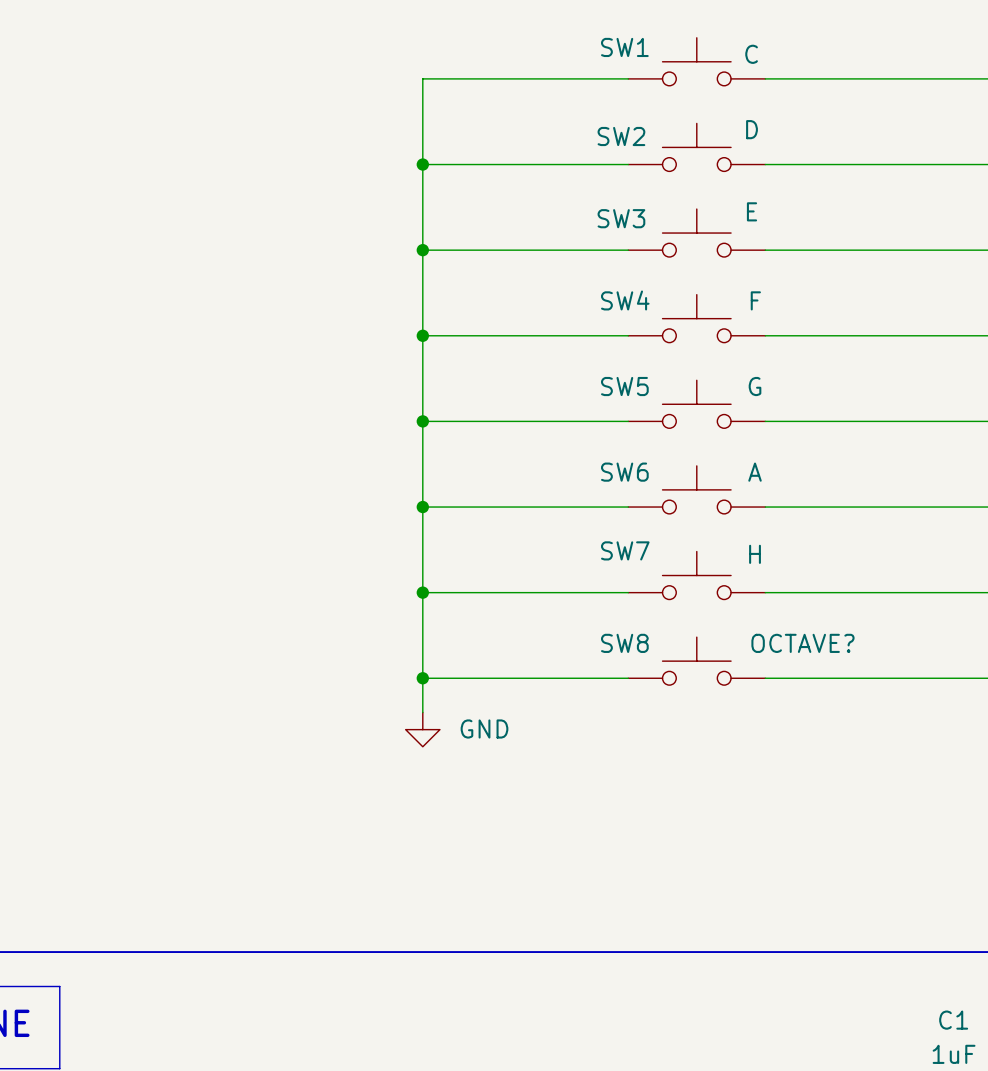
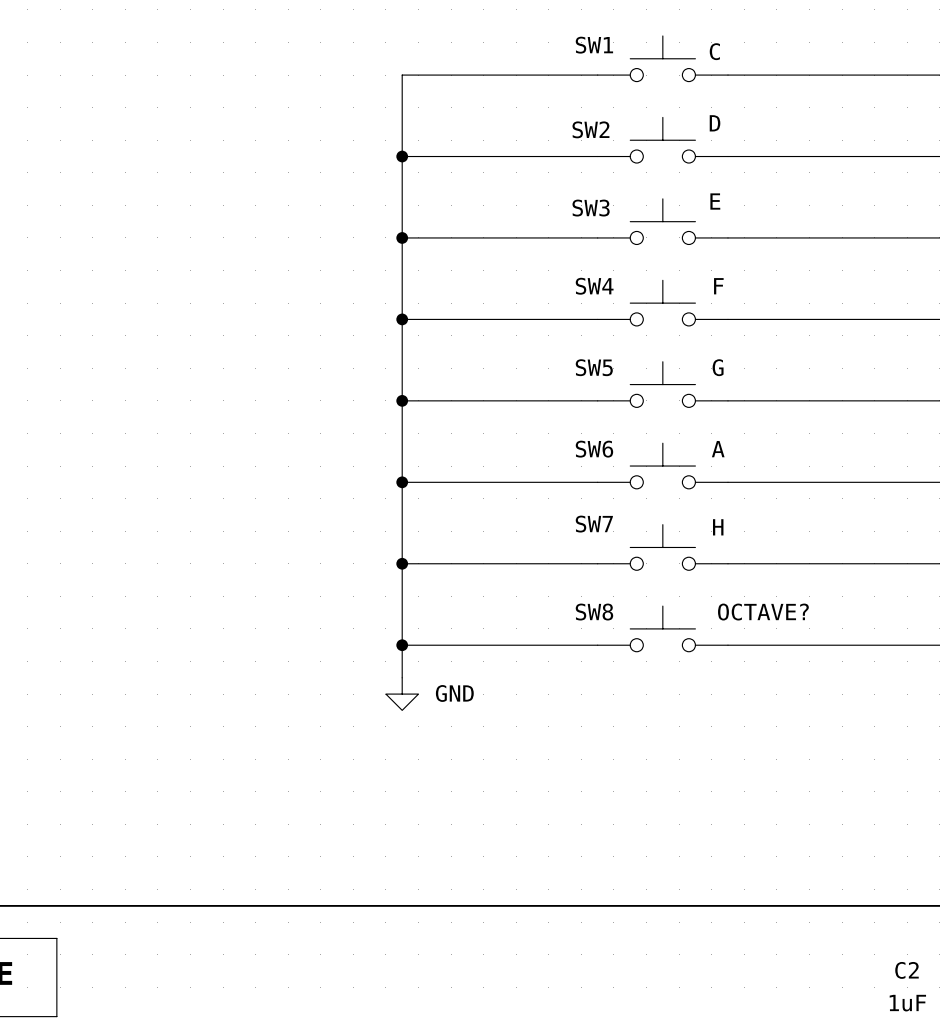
C1 name: C1 (953, 1020) -> C2 (906, 970)

